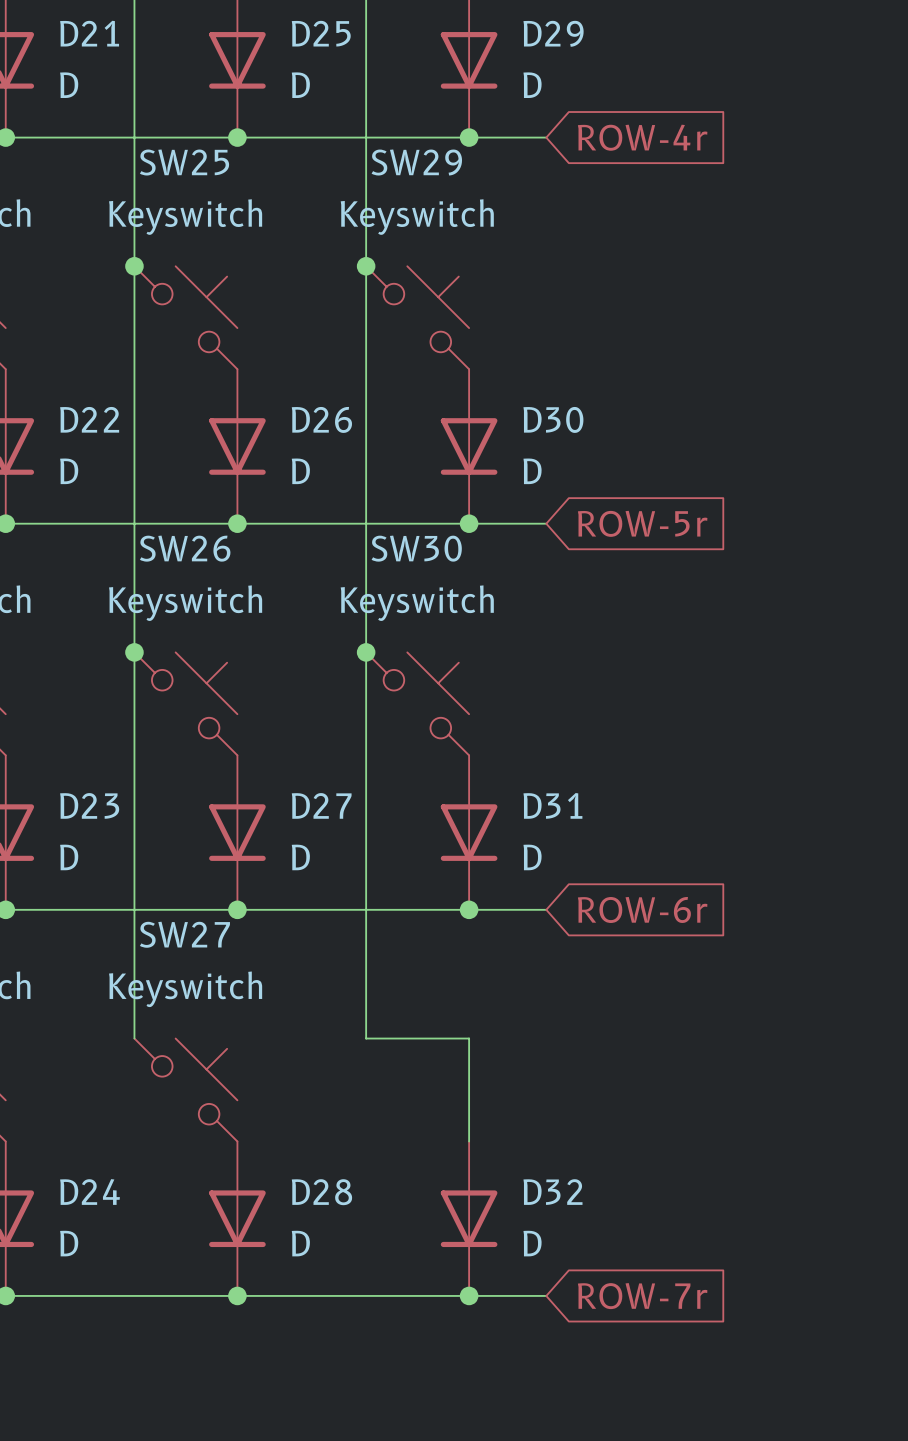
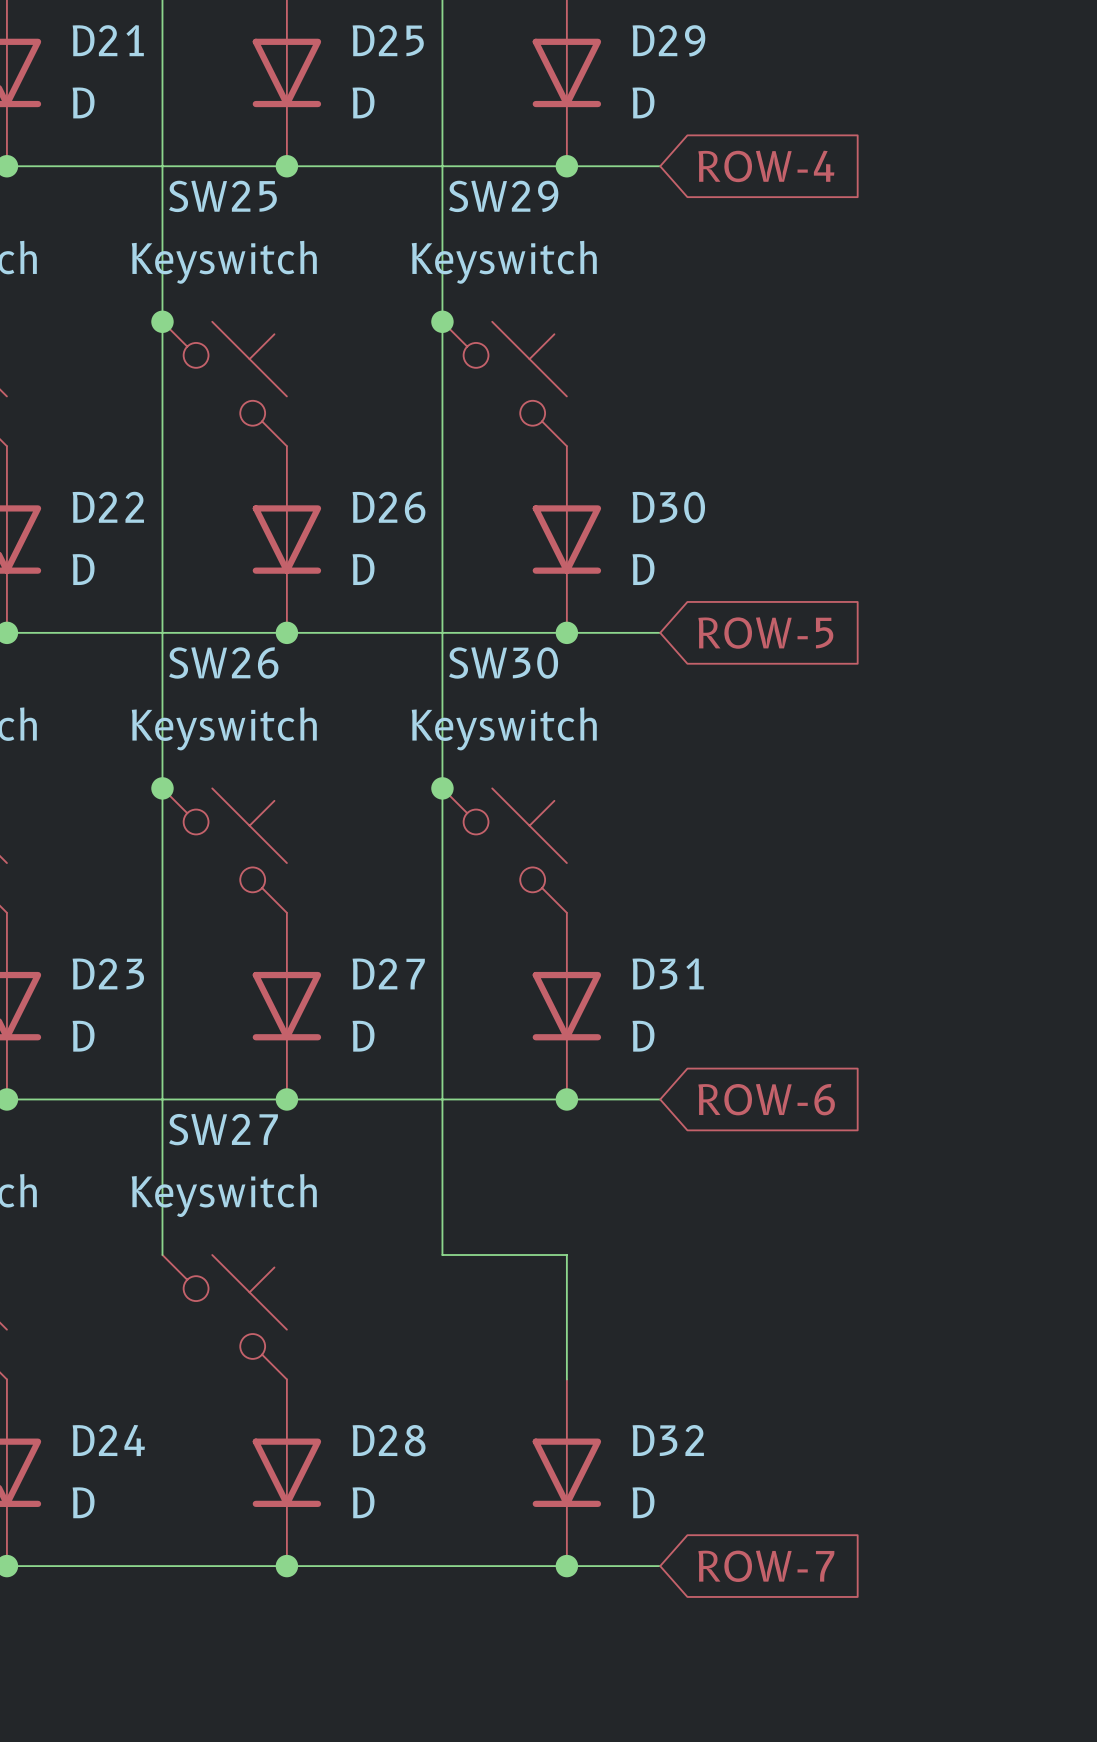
global label: ROW-4r (642, 137) -> ROW-4 (766, 166)
global label: ROW-5r (642, 523) -> ROW-5 (765, 633)
global label: ROW-6r (642, 909) -> ROW-6 (766, 1099)
global label: ROW-7r (642, 1296) -> ROW-7 (766, 1566)

